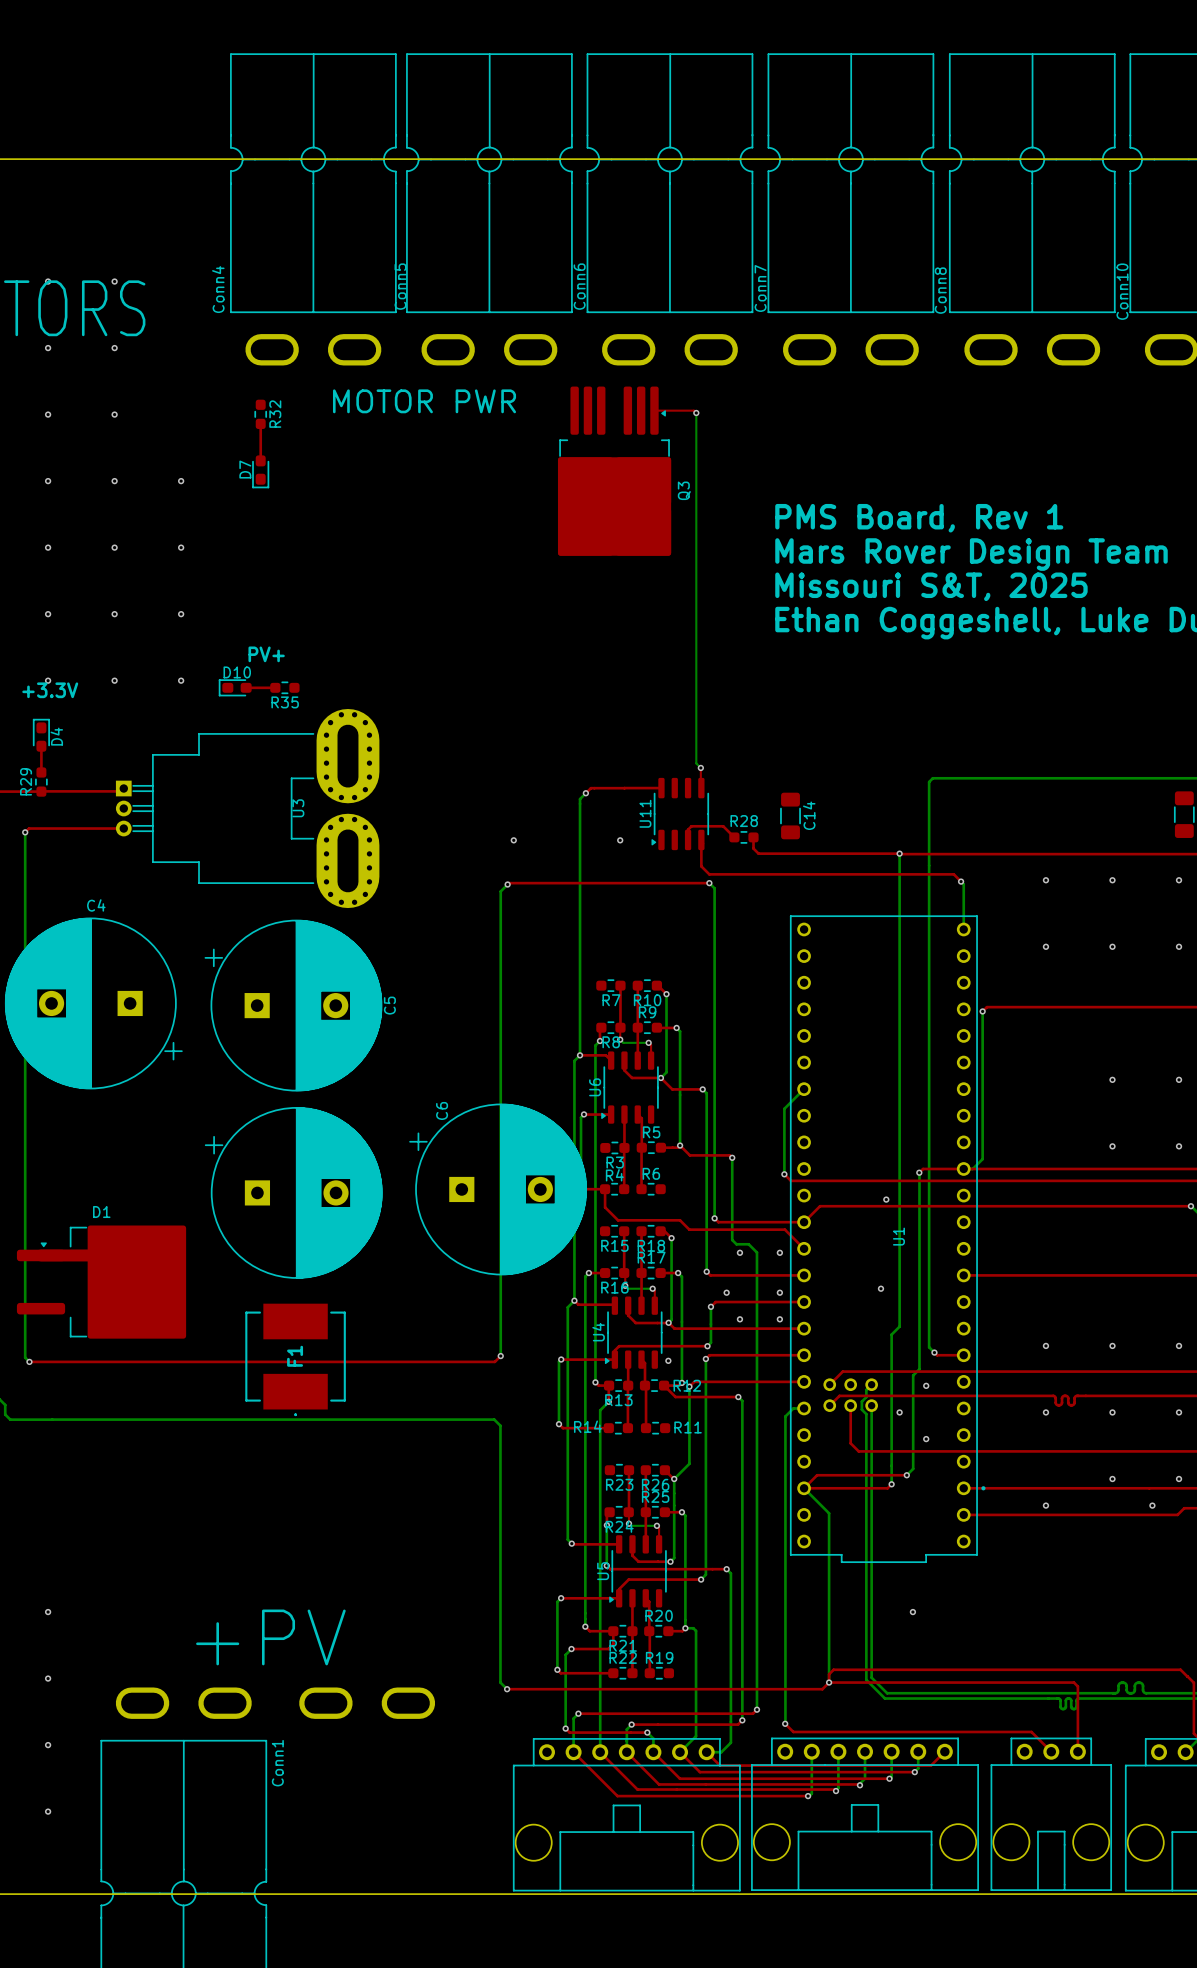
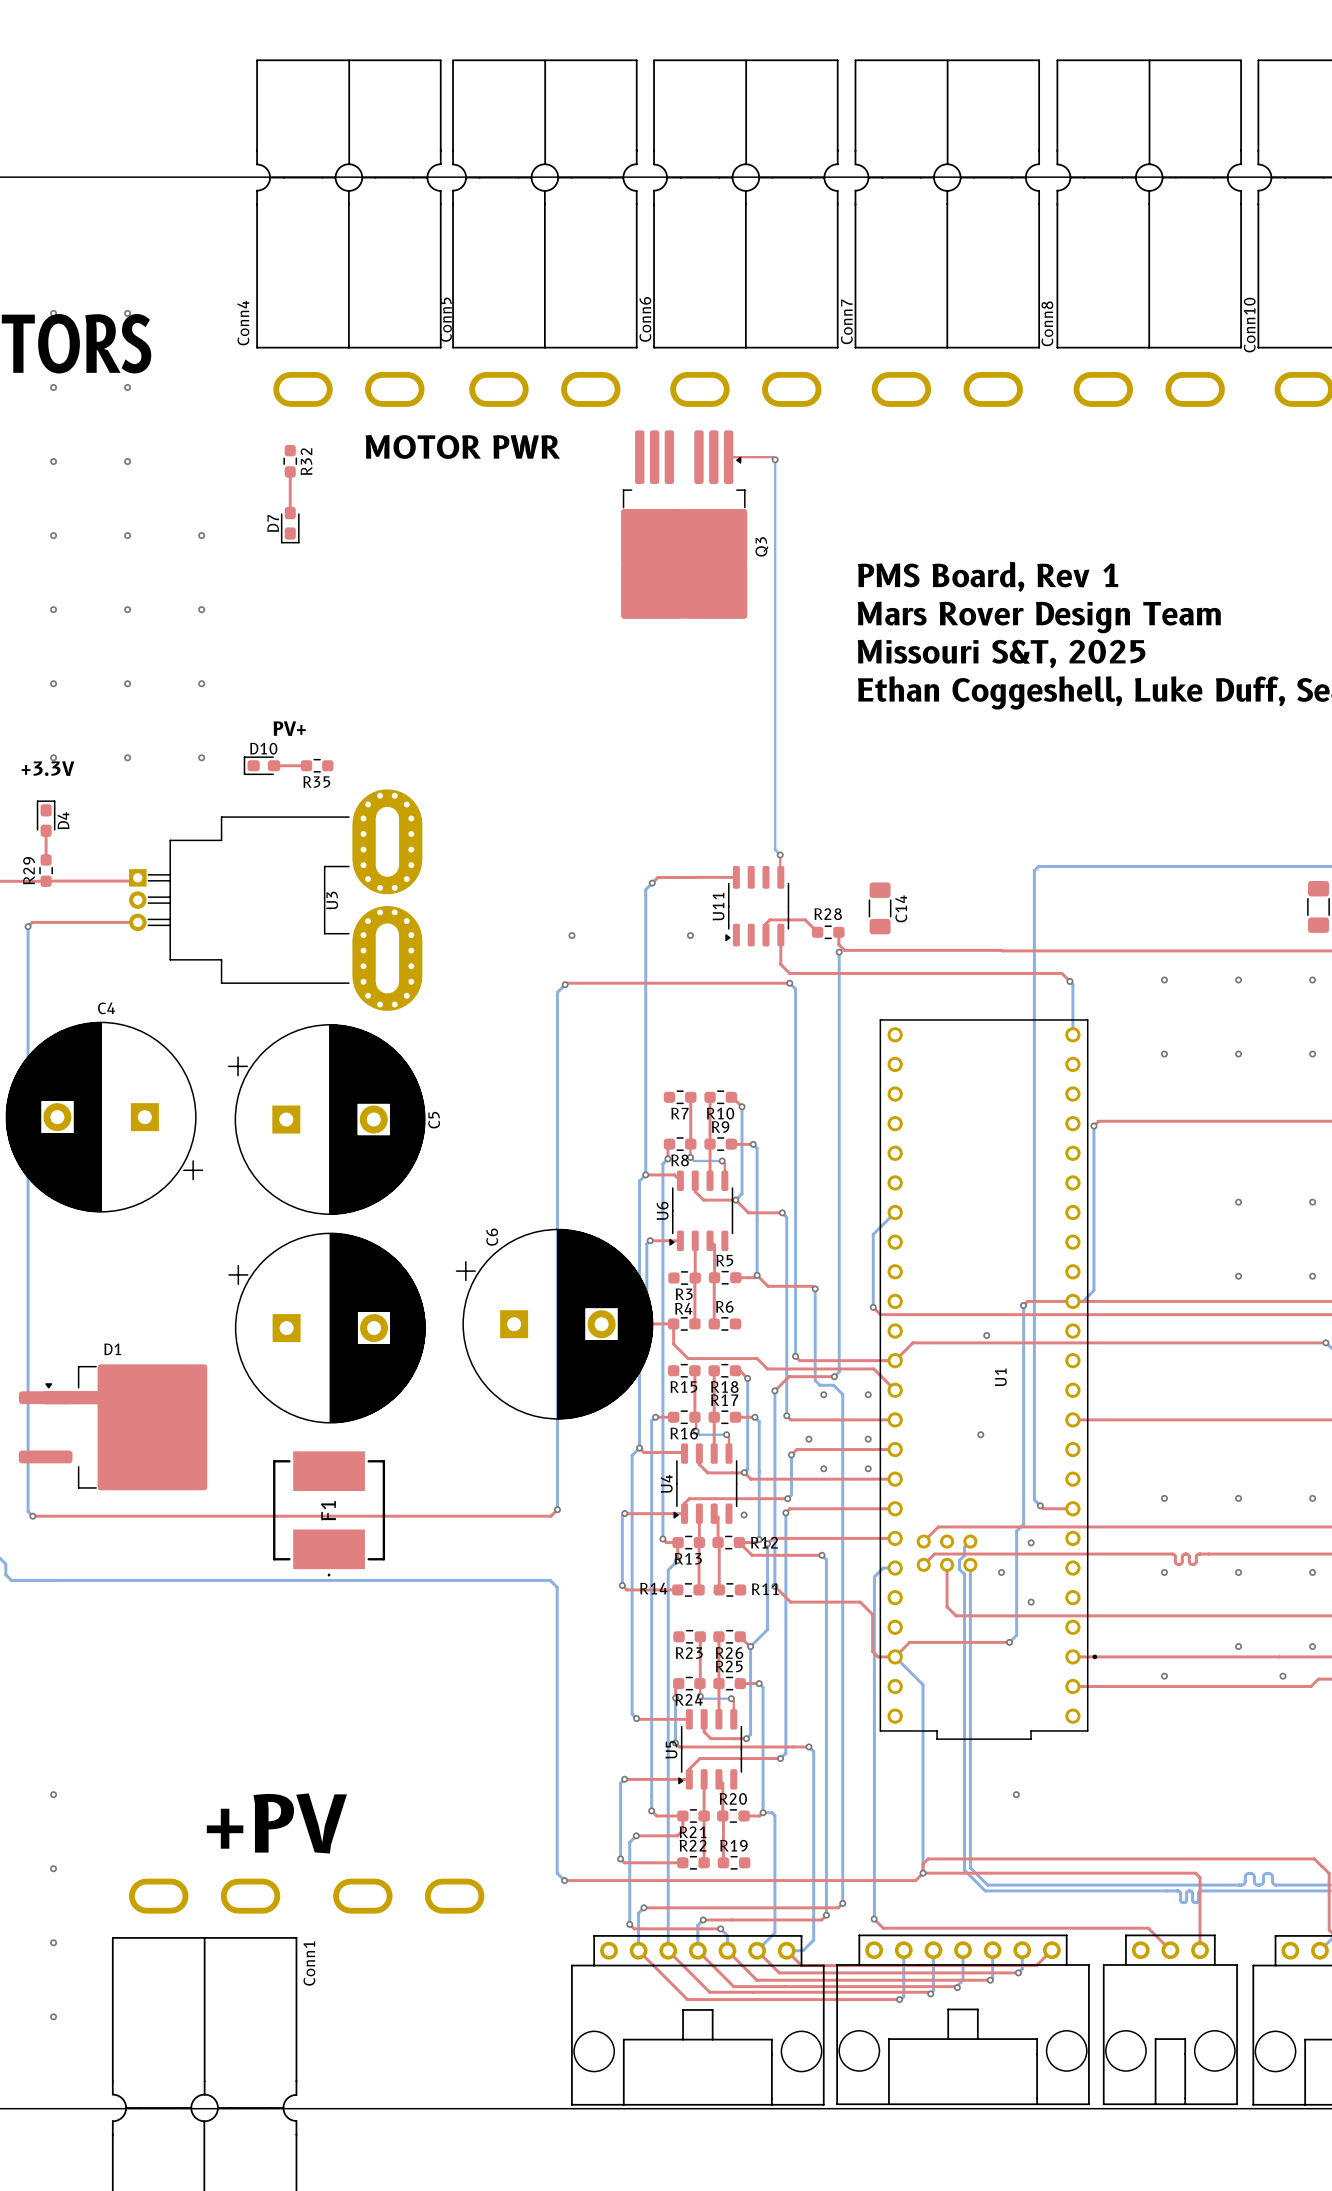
bottom track: (899, 853) (899, 1326) (891, 1334) (891, 1484) -> none
via: (899, 853) -> none
bottom track: none -> (839, 952) (839, 1371) (834, 1376)
via: none -> (839, 952)
top track: none -> (834, 1376) (789, 1376) (774, 1390)
via: none -> (834, 1376)
bottom track: none -> (774, 1390) (774, 1586)
via: none -> (774, 1390)
via: none -> (774, 1586)
top track: (891, 1484) (887, 1488) (804, 1488) -> (774, 1586) (790, 1602) (860, 1602) (872, 1614) (872, 1651) (878, 1656) (895, 1656)
via: (891, 1484) -> none

